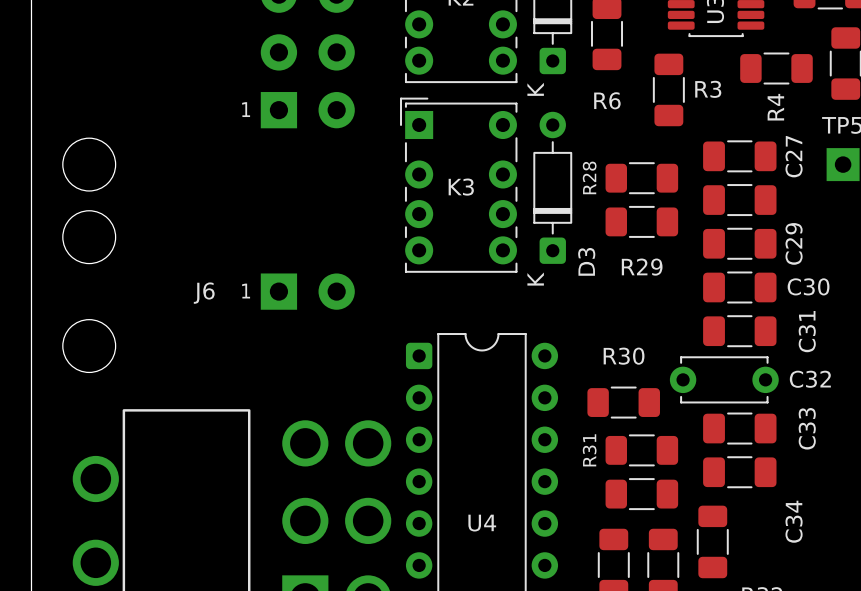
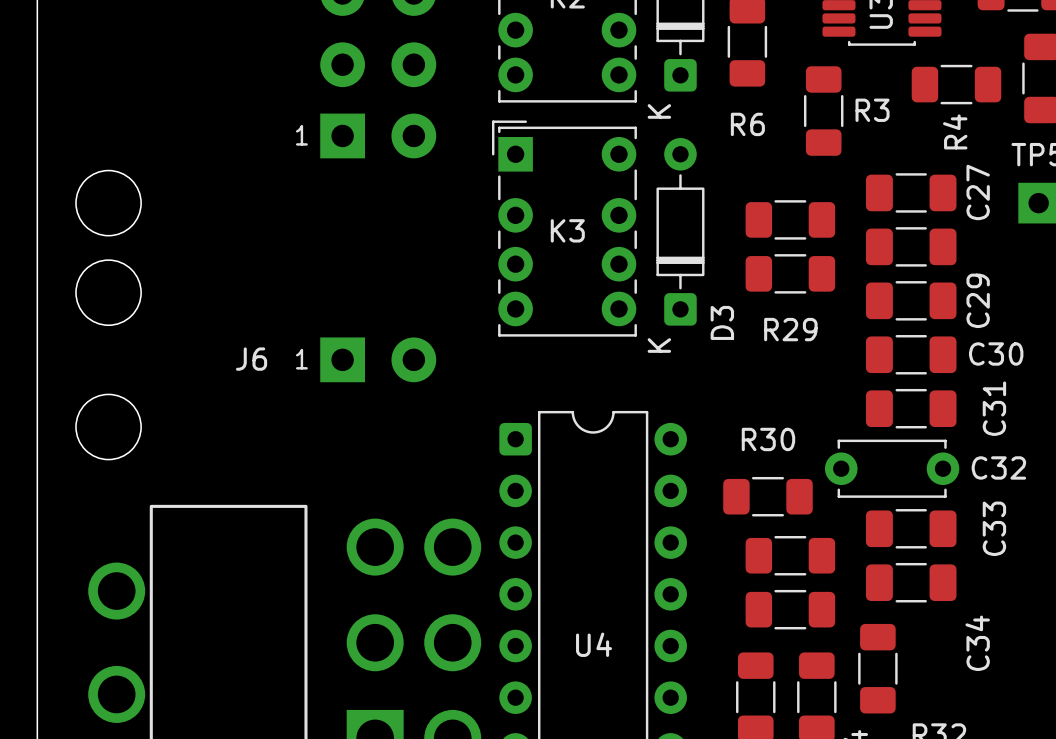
R28 name: R28 (589, 177) -> none
R31 name: R31 (589, 450) -> none

